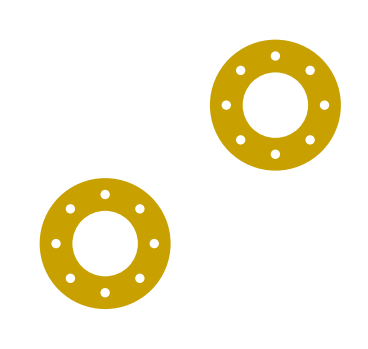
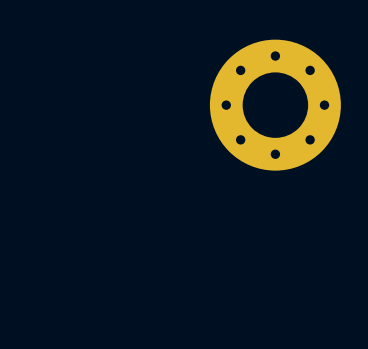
part: (105, 243) -> none

